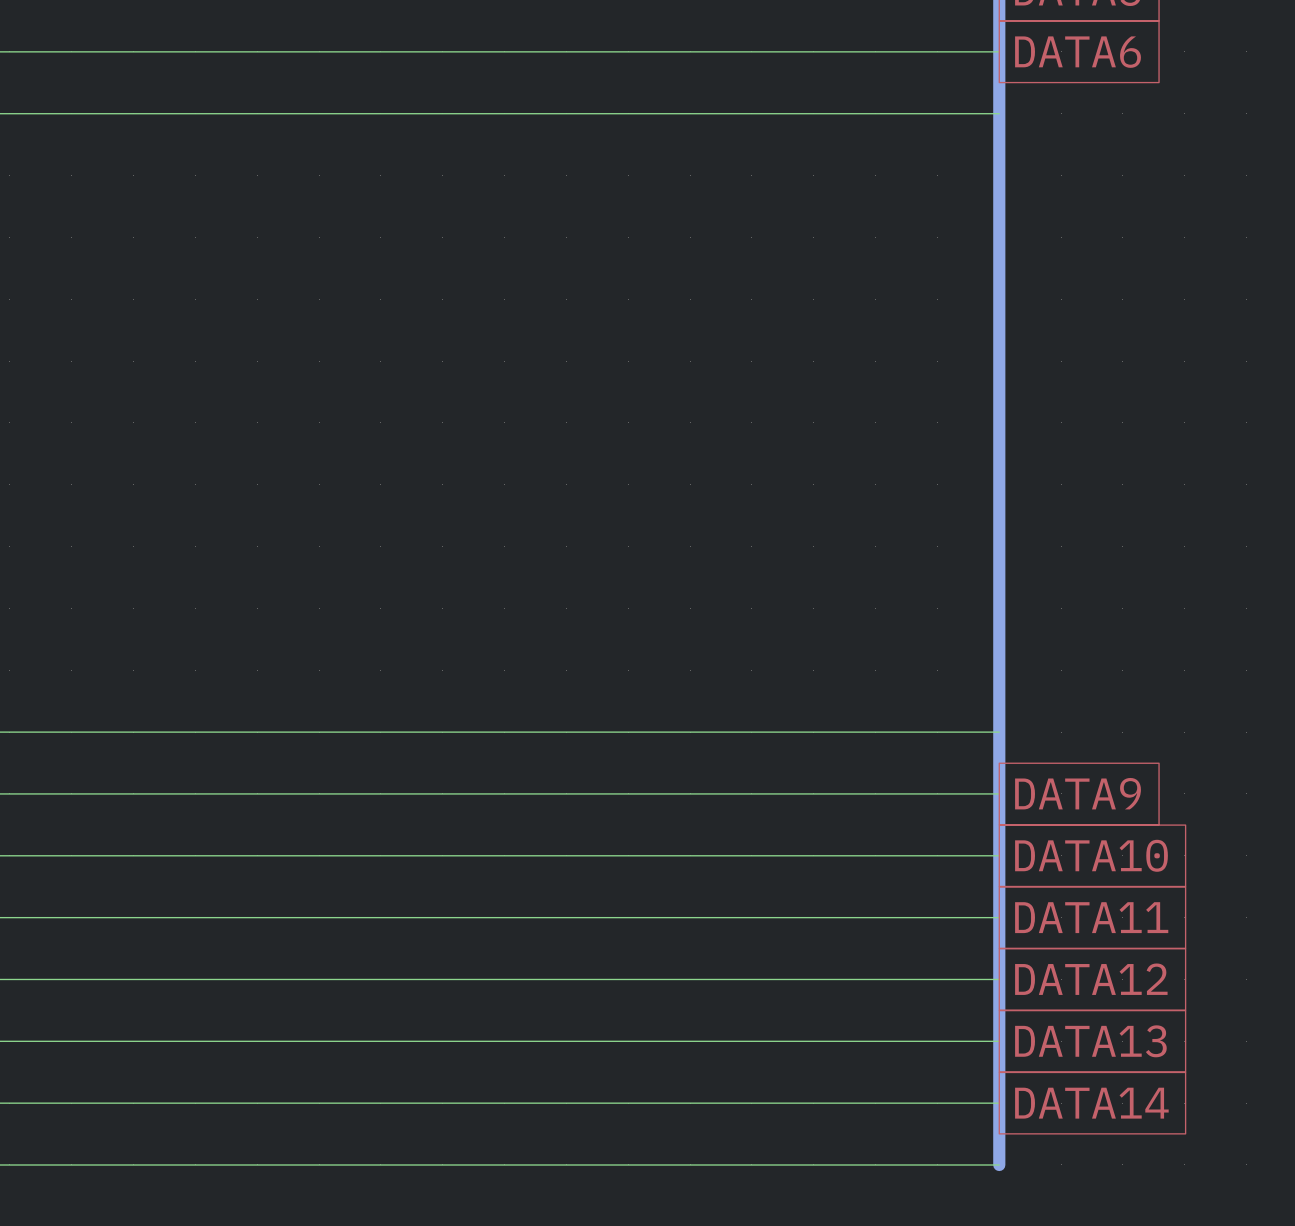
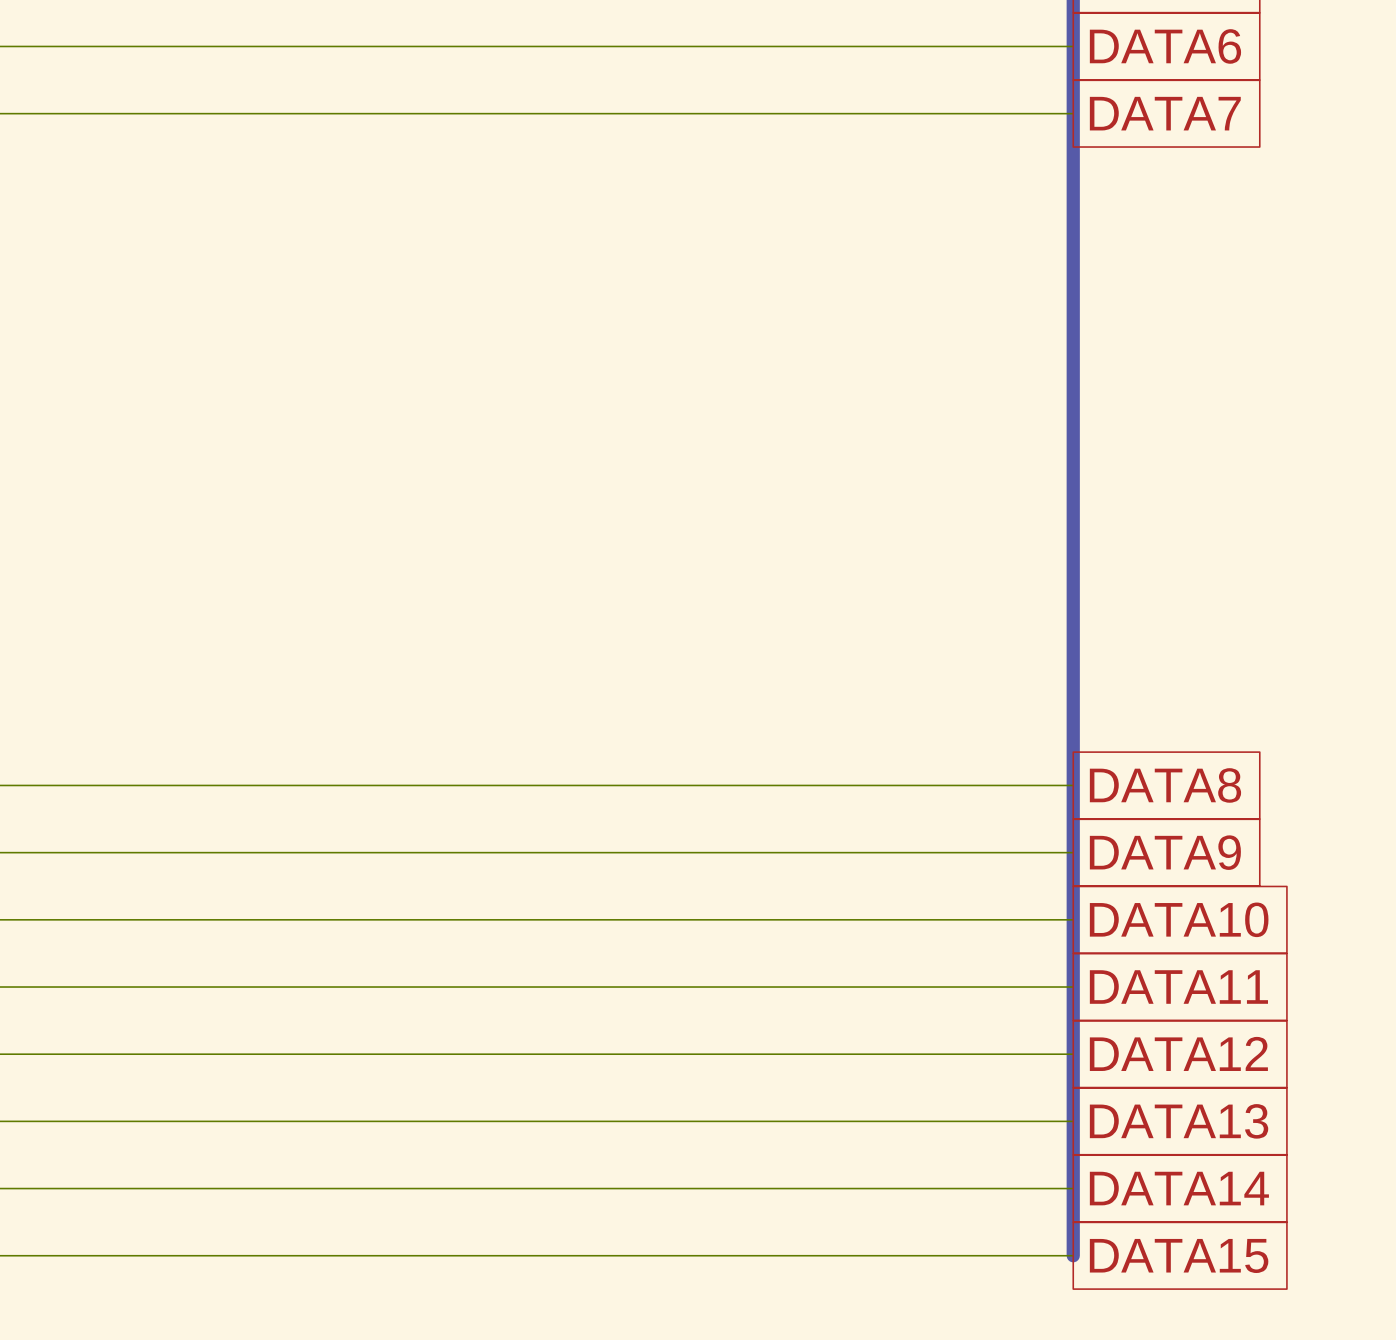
global label: none -> DATA7 (1165, 113)
global label: none -> DATA8 (1165, 785)
global label: none -> DATA15 (1179, 1255)

